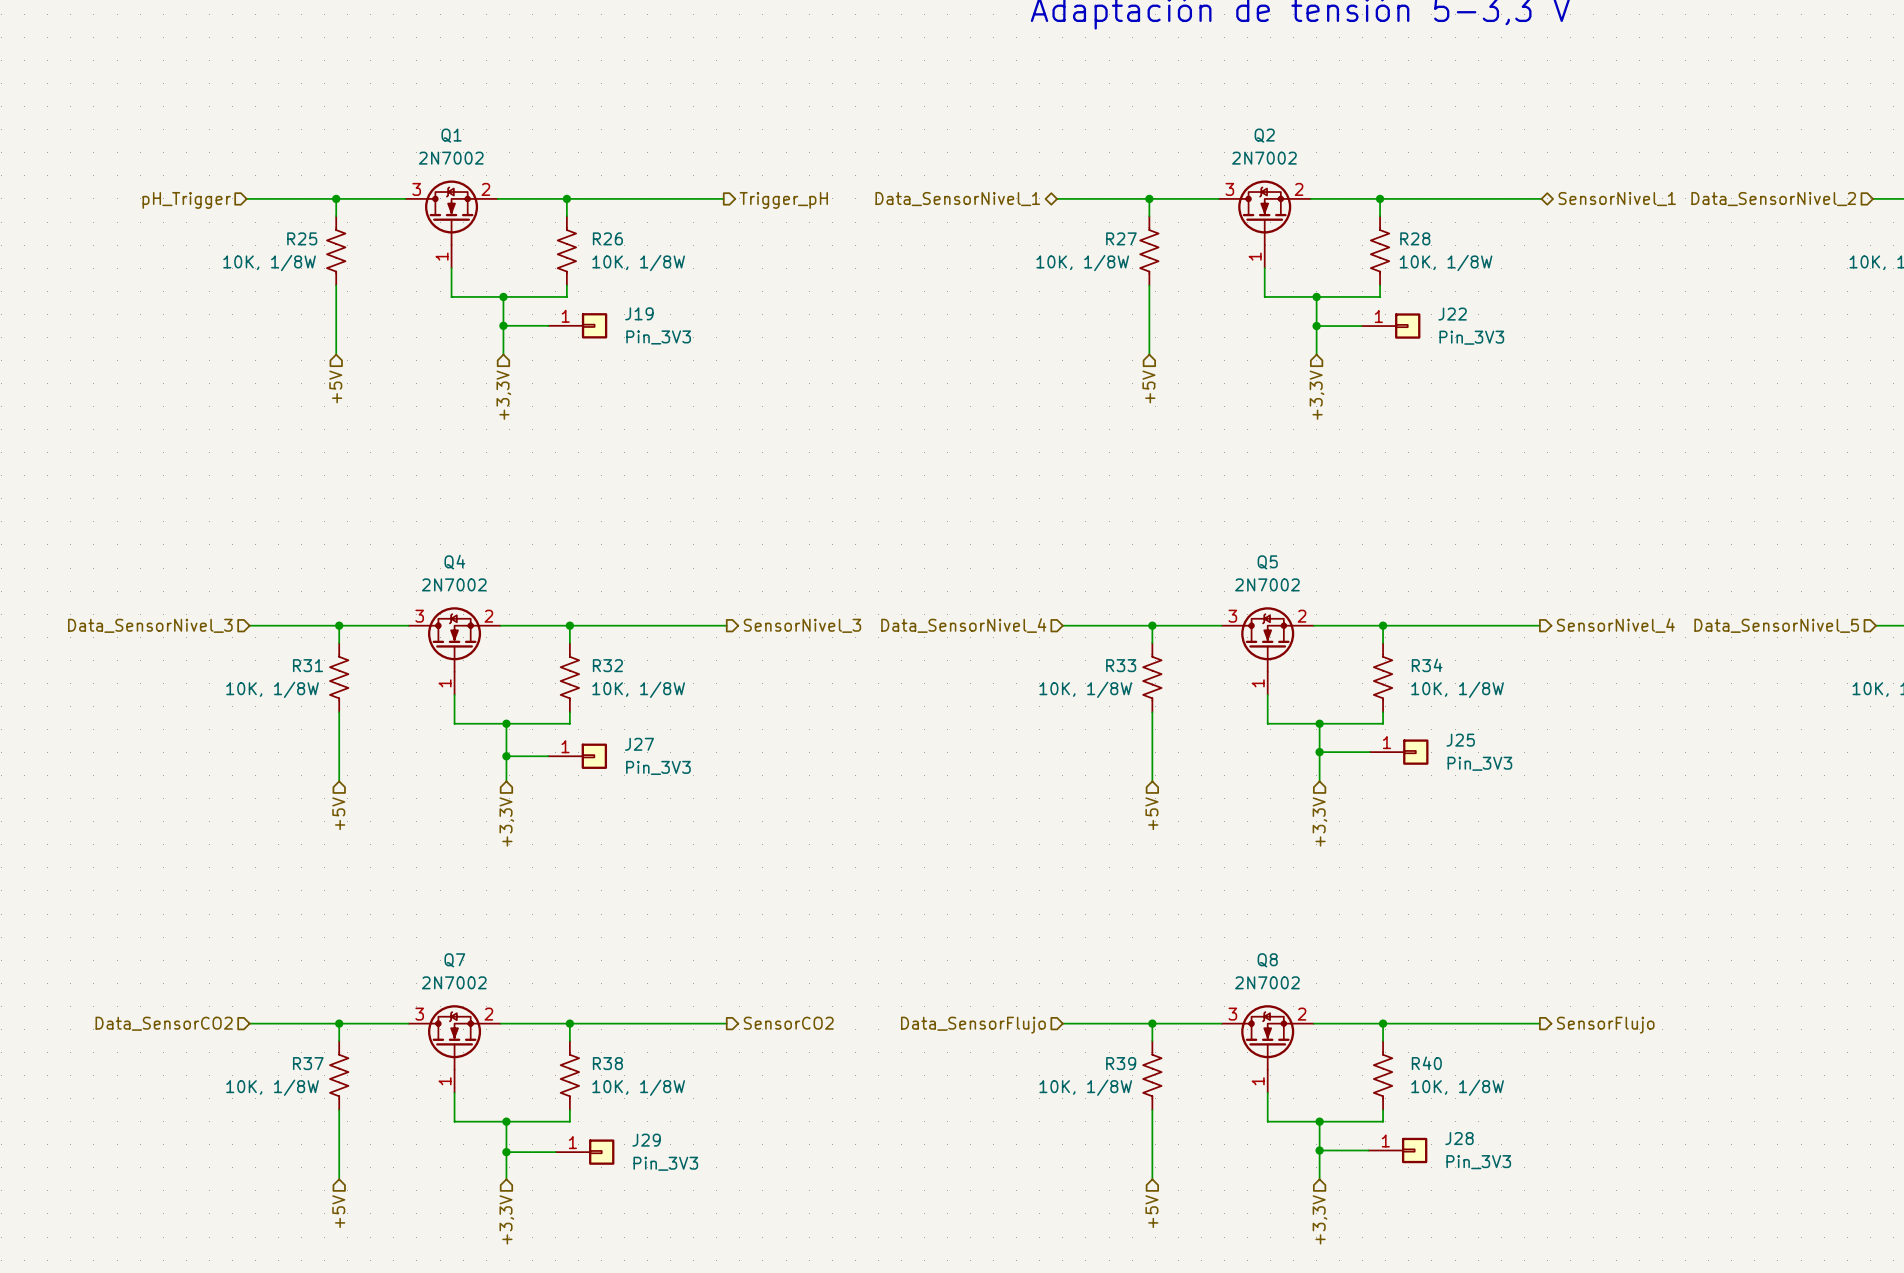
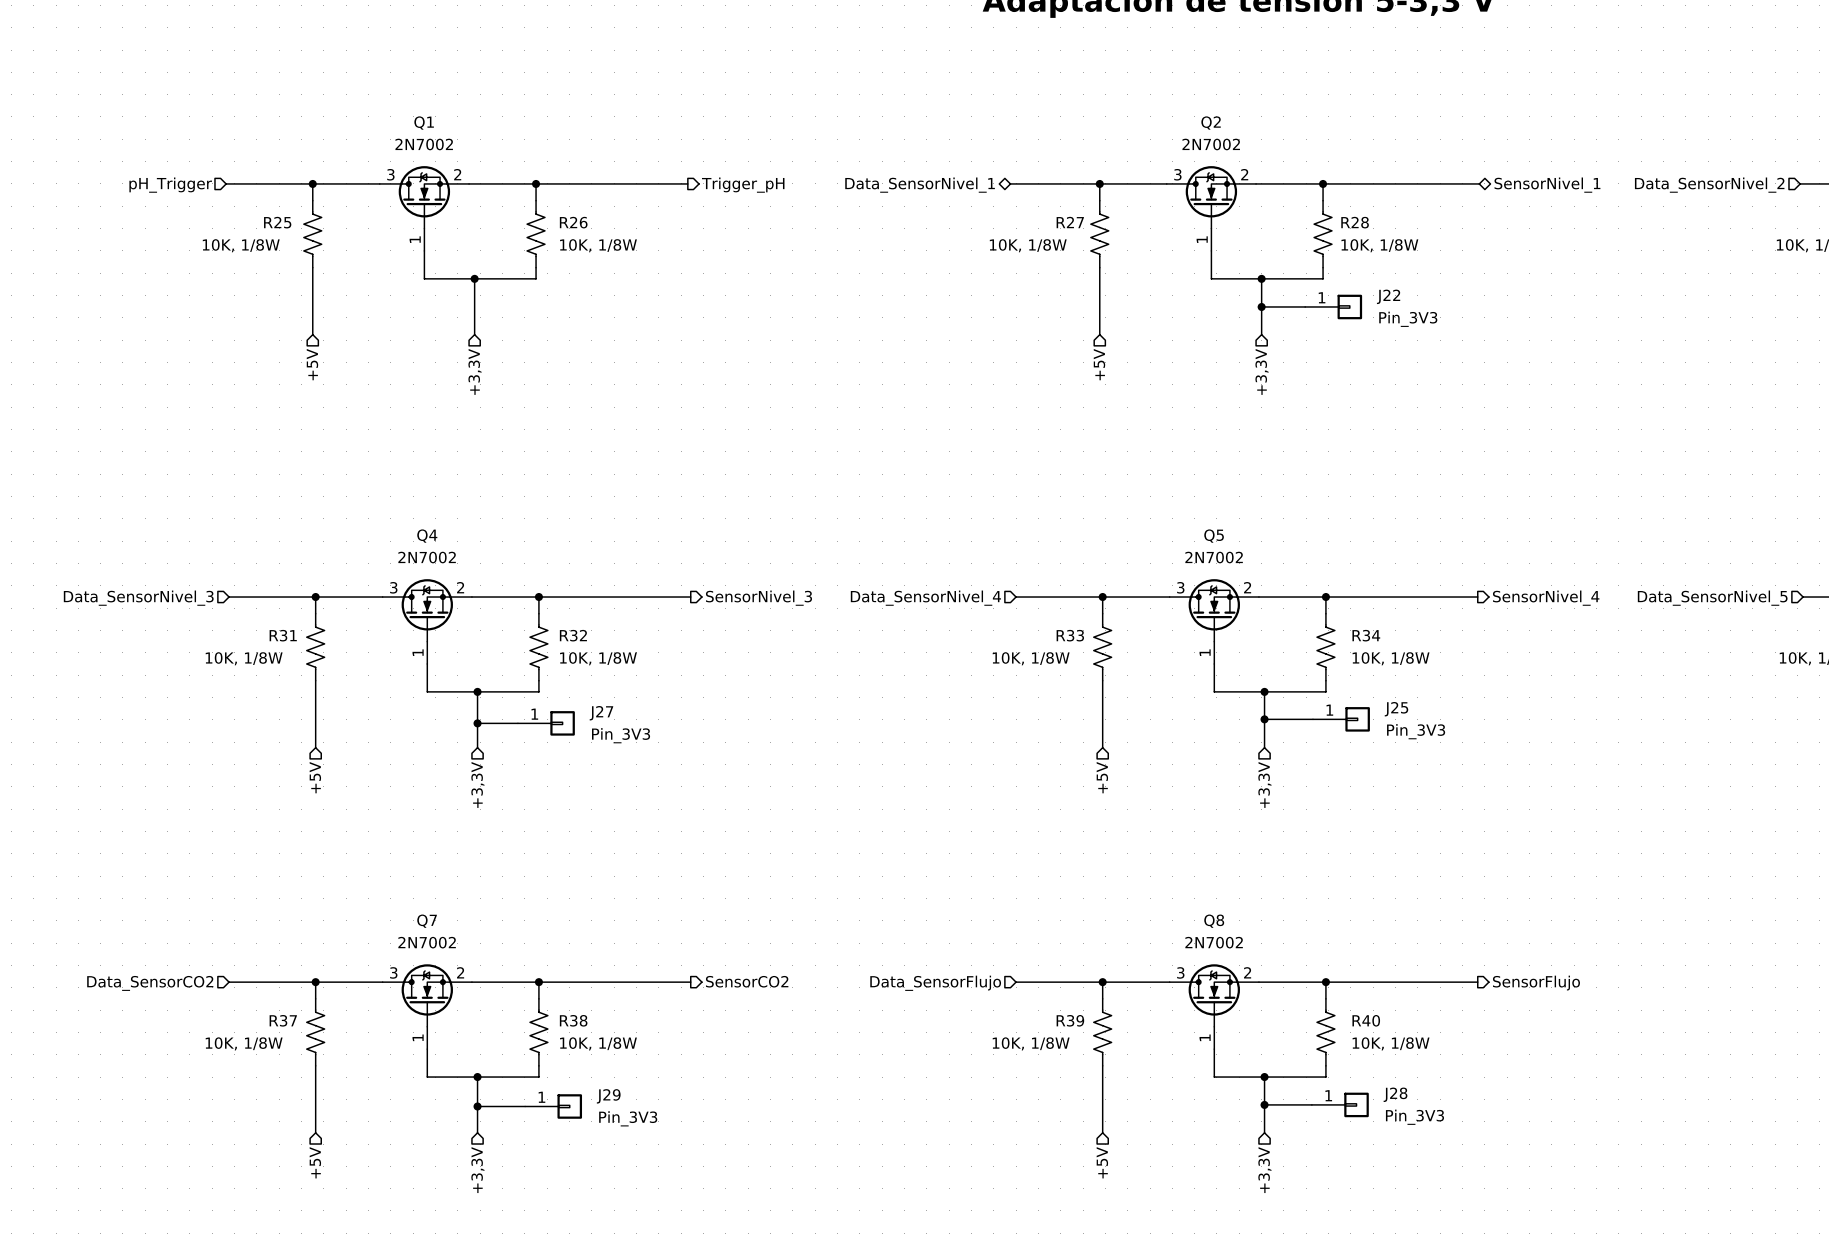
wire: (503, 325) (548, 325) -> none
junction: (503, 325) -> none
J19: Pin_3V3 (577, 325) -> none

